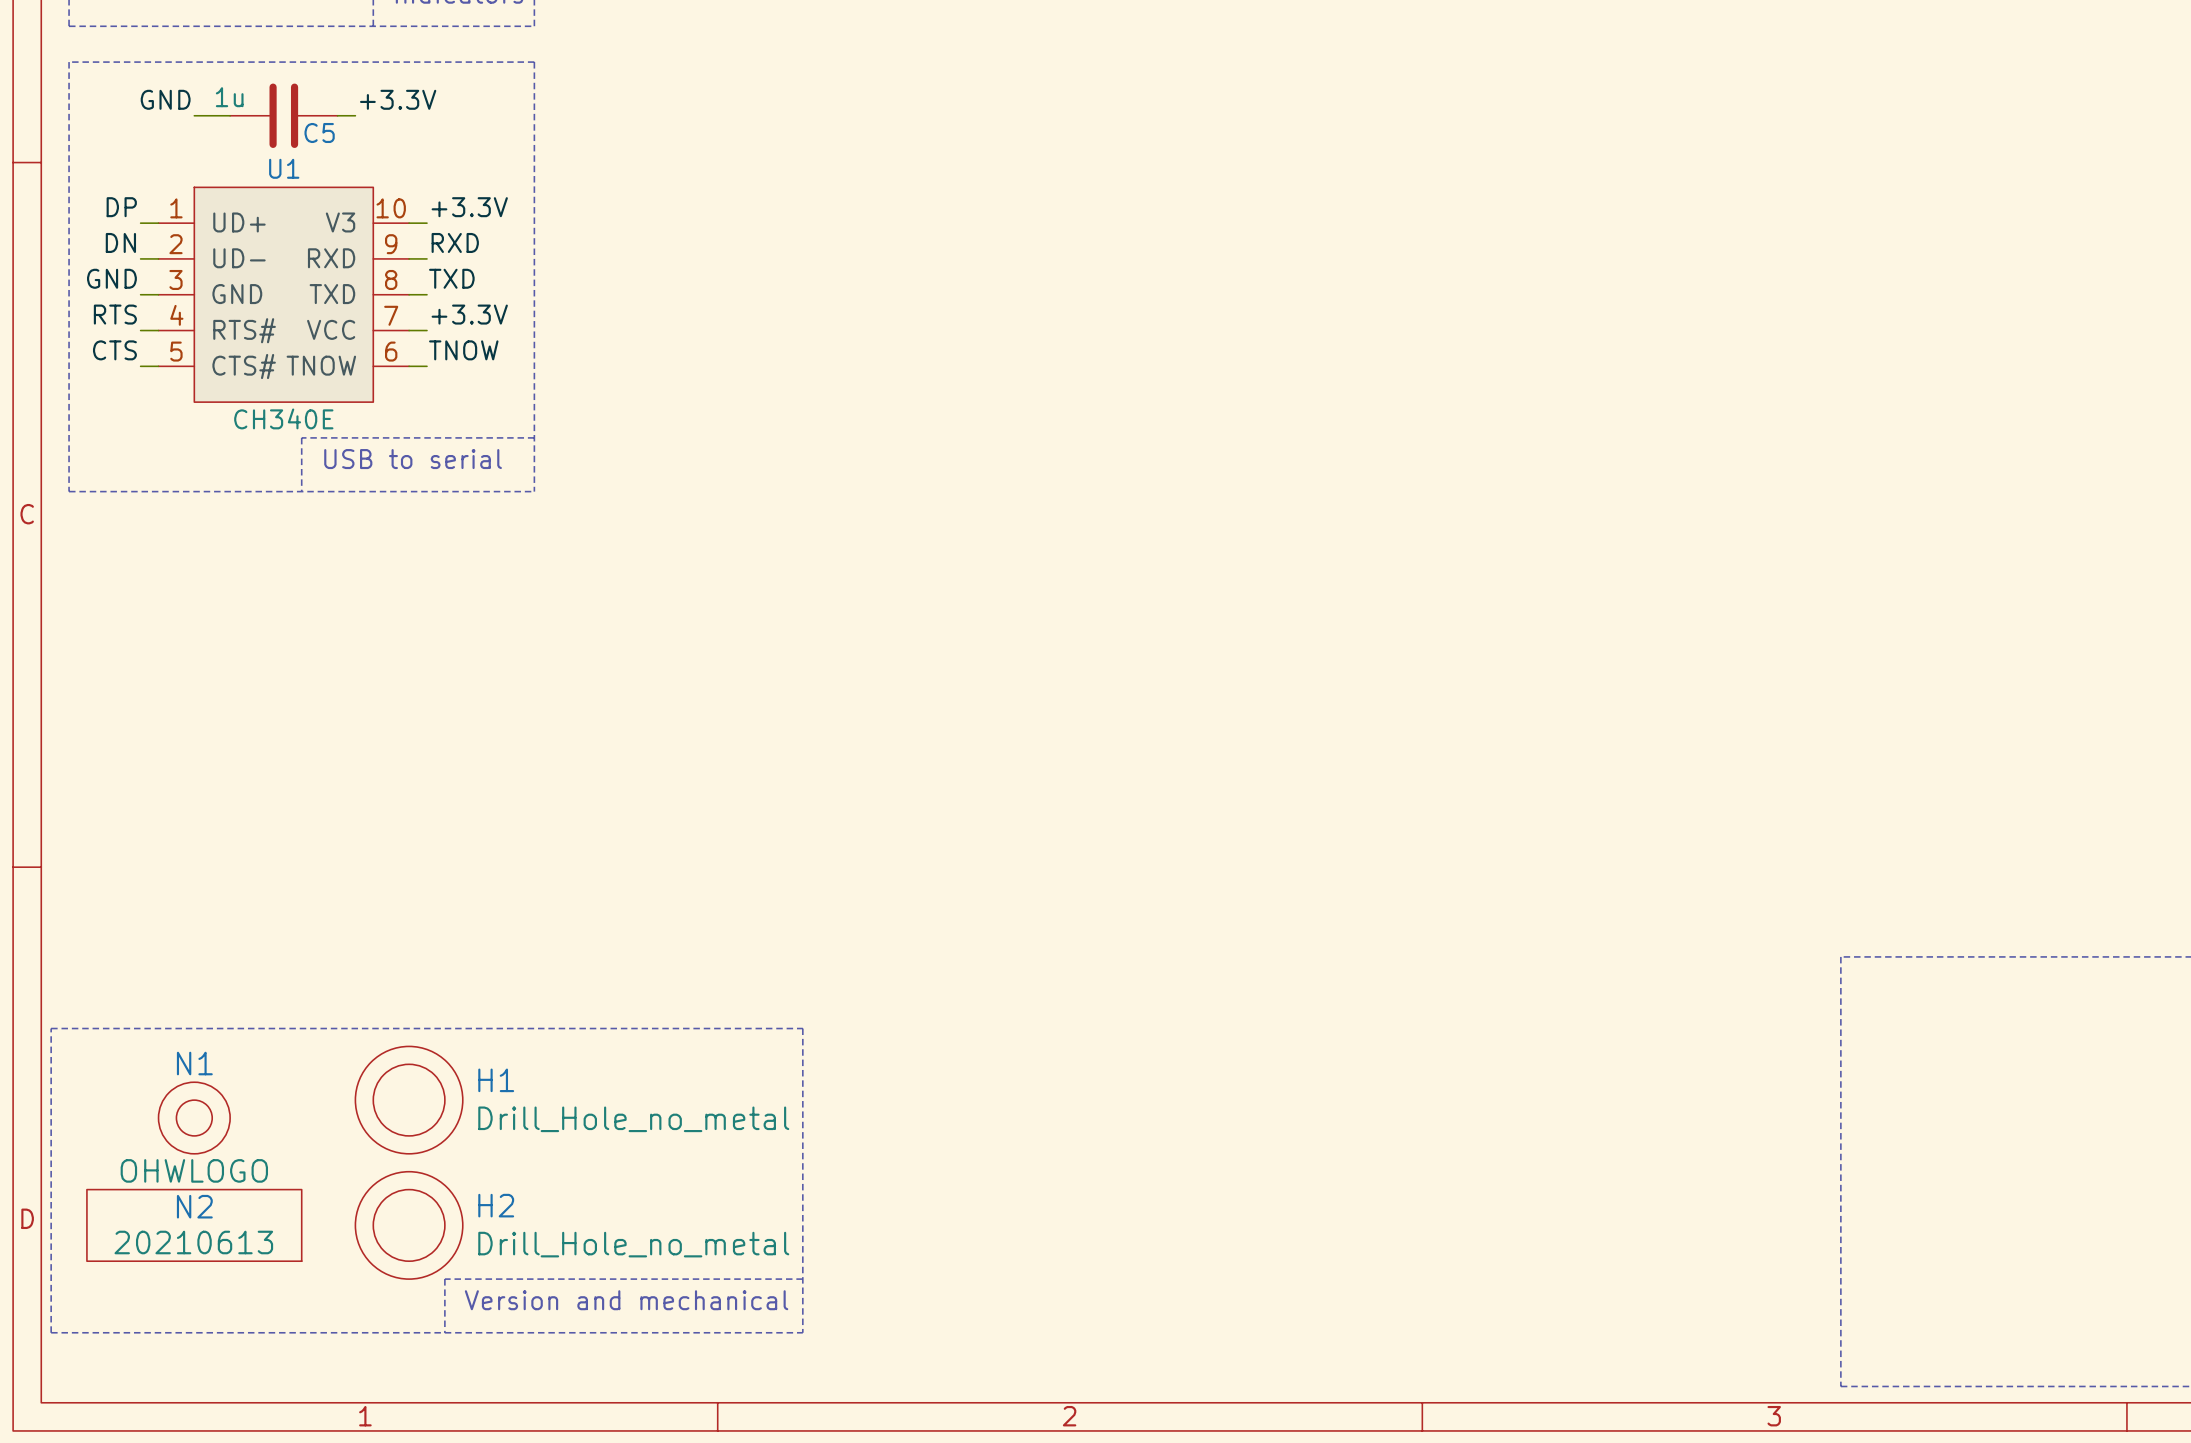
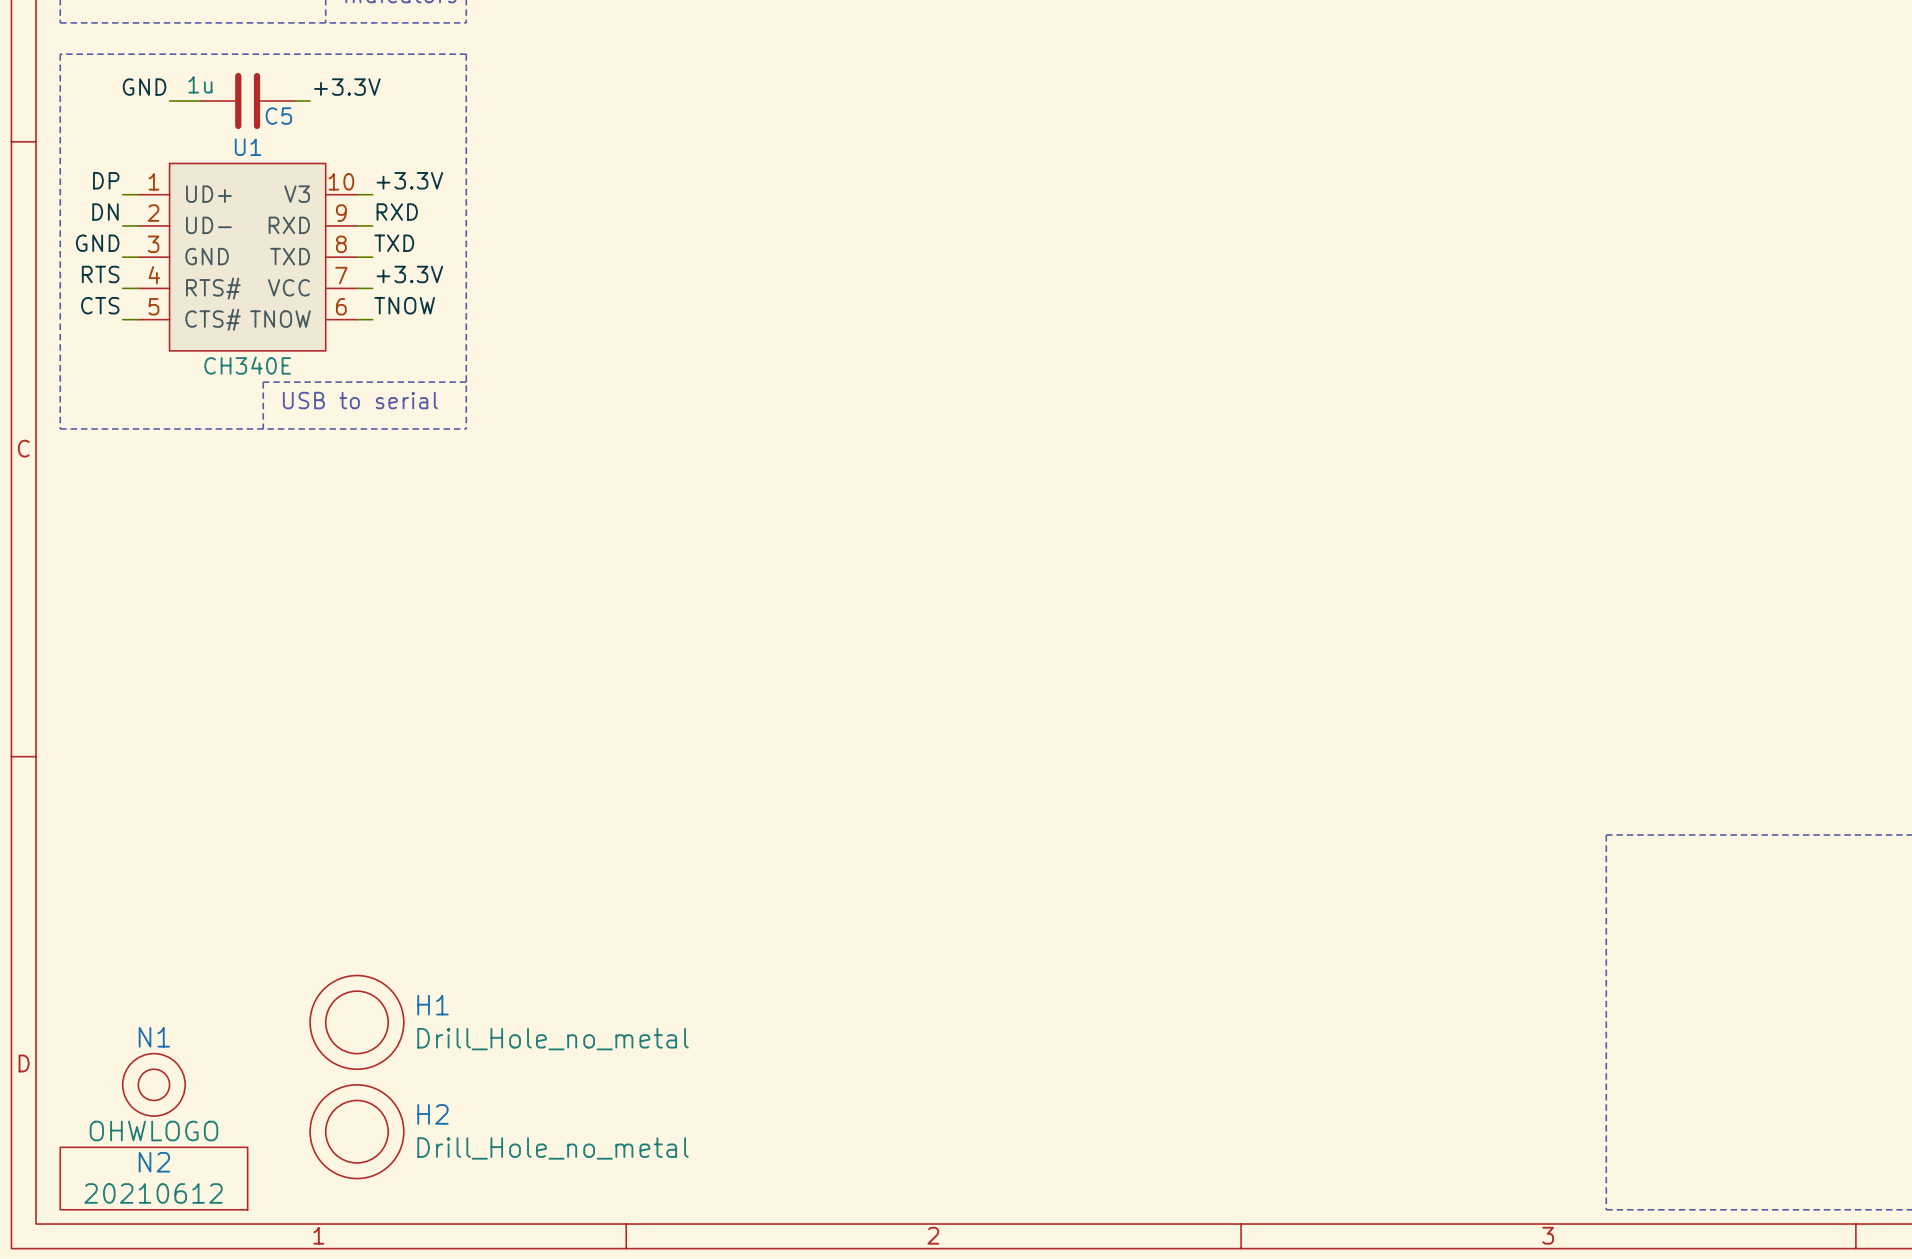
line: (51, 1028) (51, 1332) (802, 1332) (802, 1028) (51, 1028) -> none
H1 position: (409, 1100) -> (356, 1022)
N1 position: (194, 1118) -> (153, 1084)
N2 position: (194, 1225) -> (153, 1178)
H2 position: (409, 1225) -> (356, 1131)
N2 value: 20210613 (193, 1242) -> 20210612 (153, 1193)
line: (802, 1279) (444, 1279) (444, 1332) -> none
text: Version and mechanical (626, 1300) -> none

